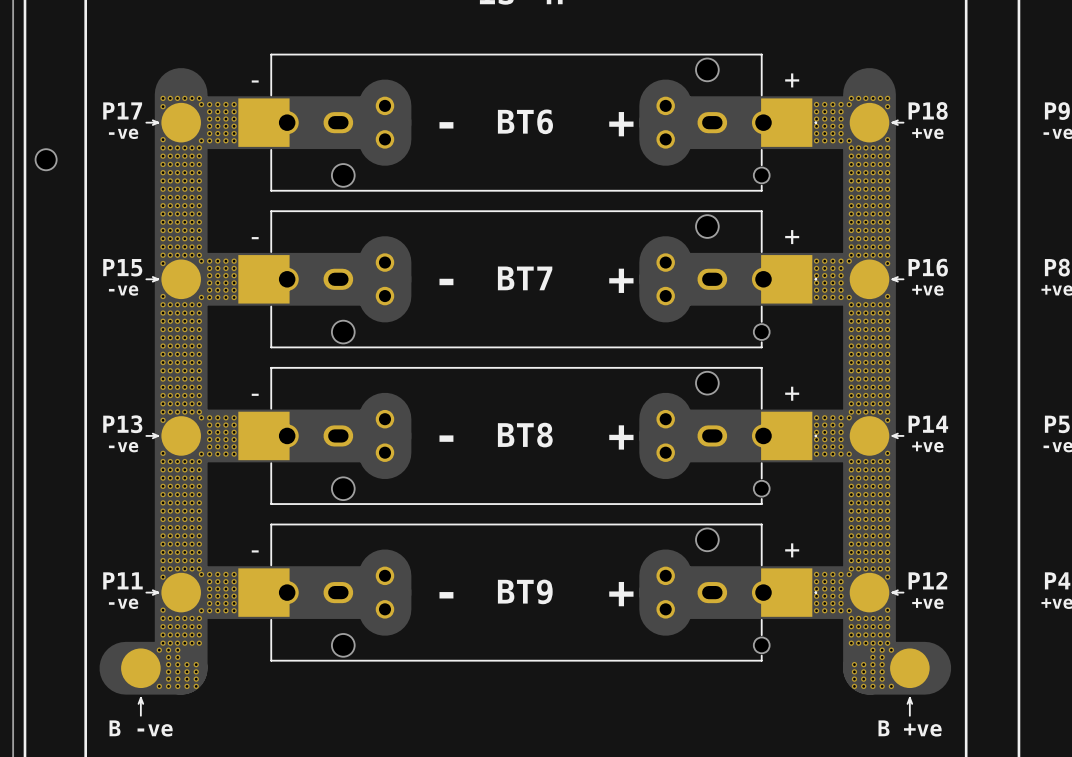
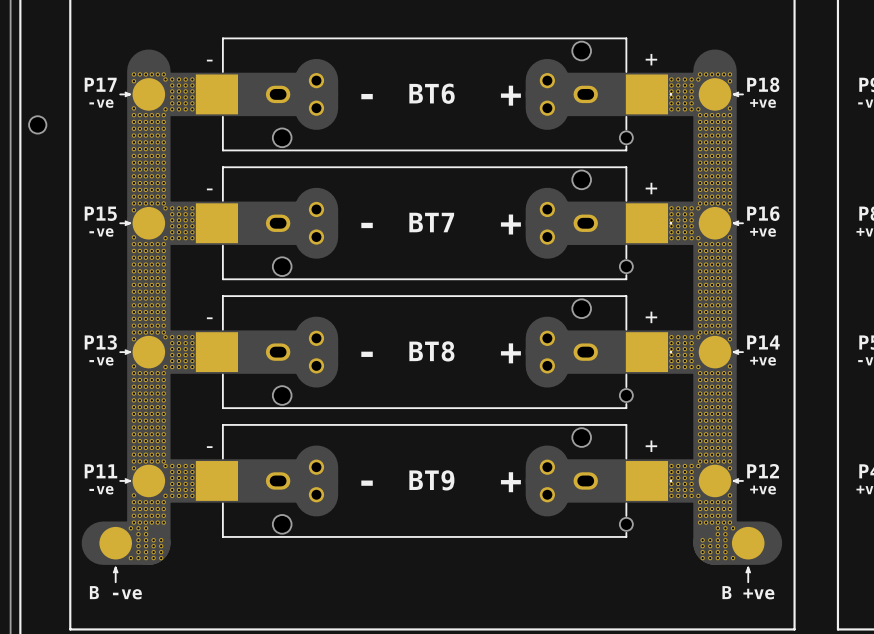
BT6 footprint: [238, 53, 817, 192] -> [195, 37, 672, 151]
BT7 footprint: [238, 210, 817, 349] -> [195, 166, 672, 280]
BT8 footprint: [238, 367, 817, 505] -> [195, 295, 672, 409]
BT9 footprint: [238, 523, 817, 662] -> [195, 424, 672, 538]

